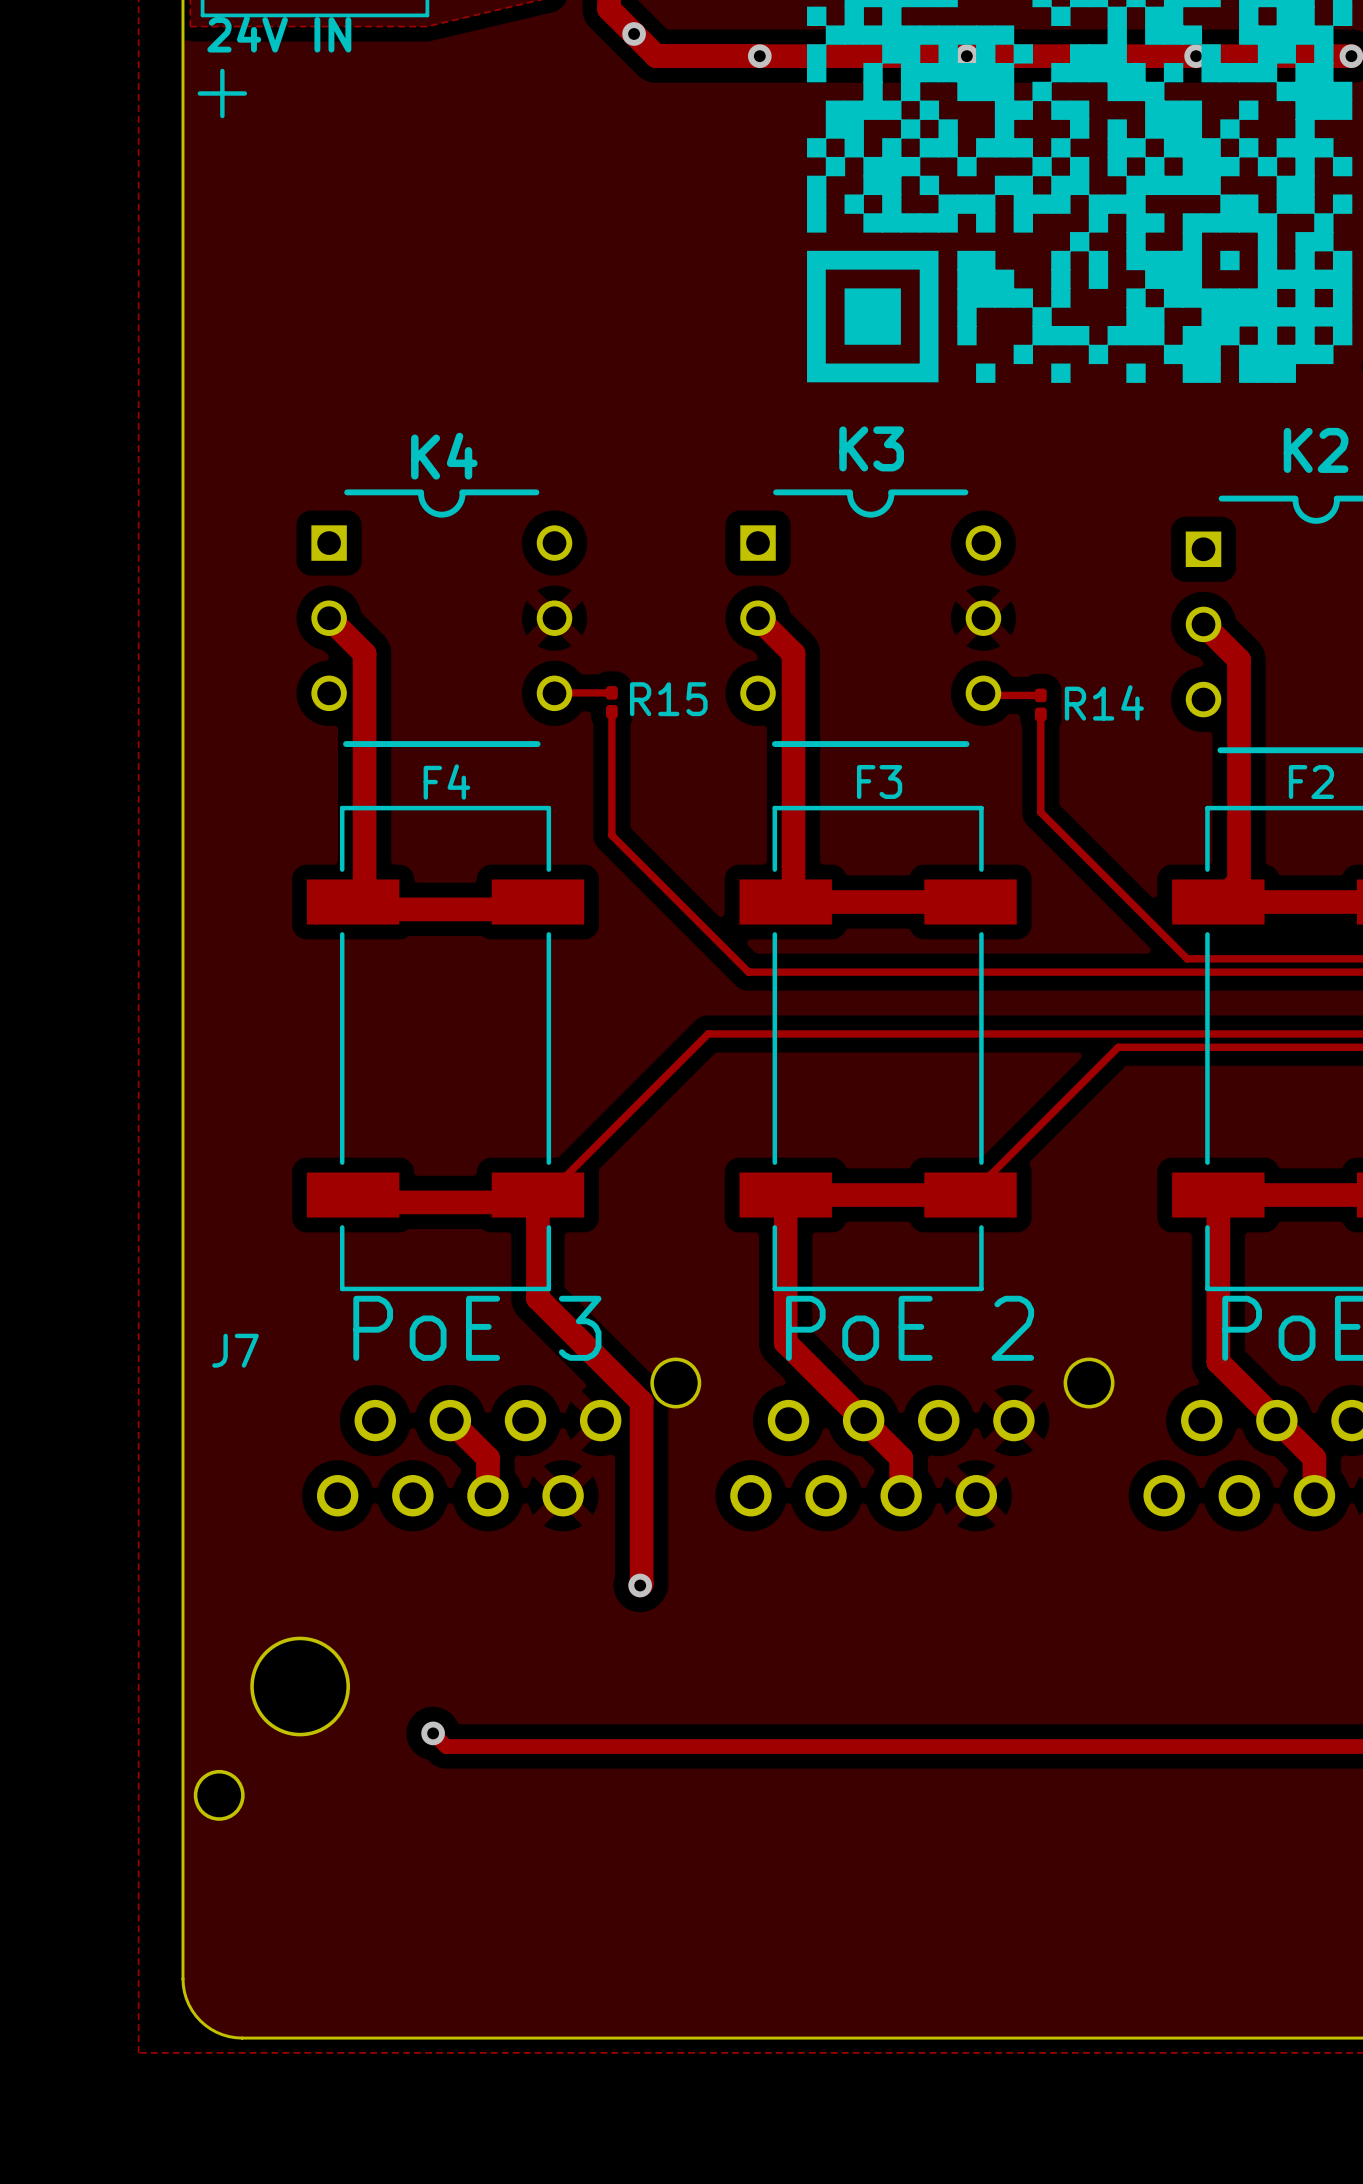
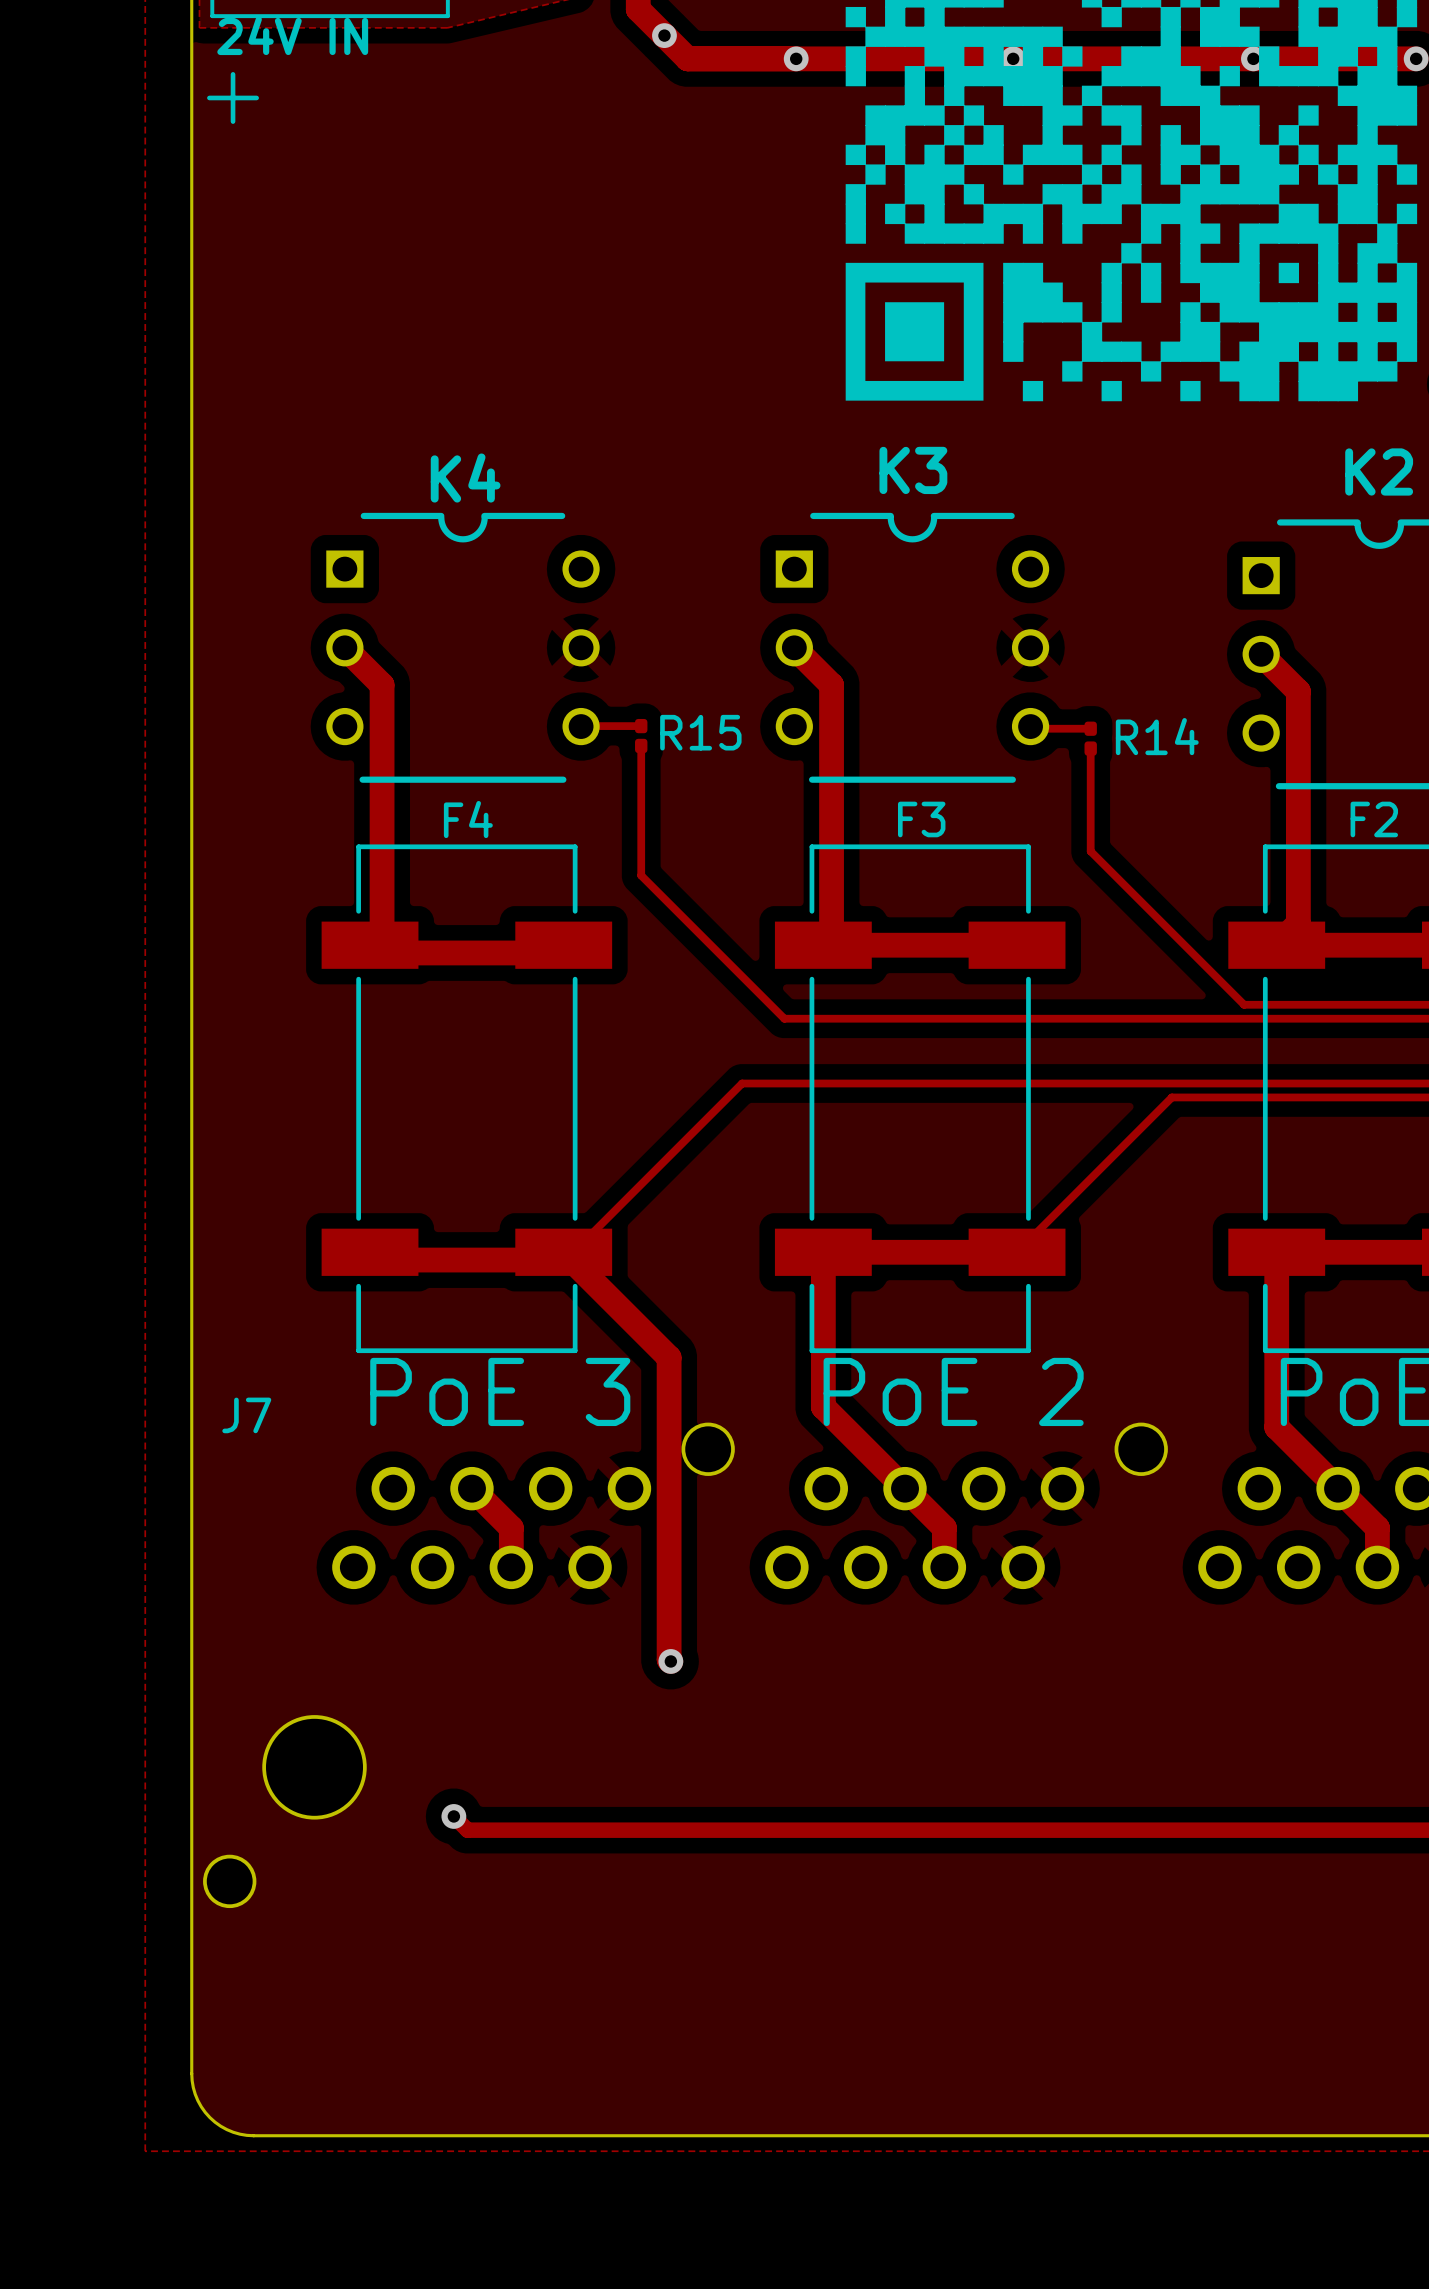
track: (537, 1195) (537, 1298) (641, 1402) (640, 1585) -> (563, 1252) (669, 1357) (669, 1659) (670, 1661)

